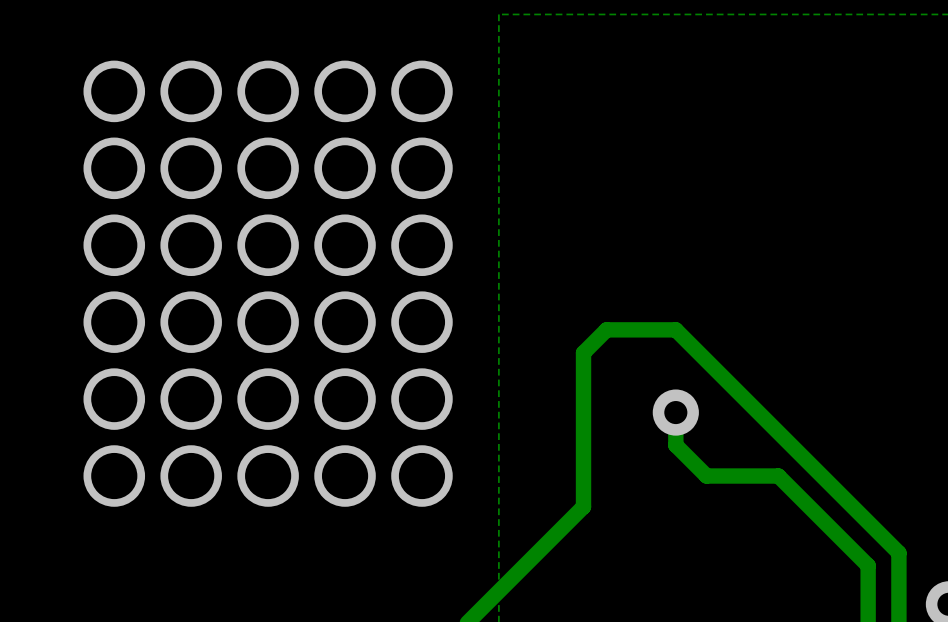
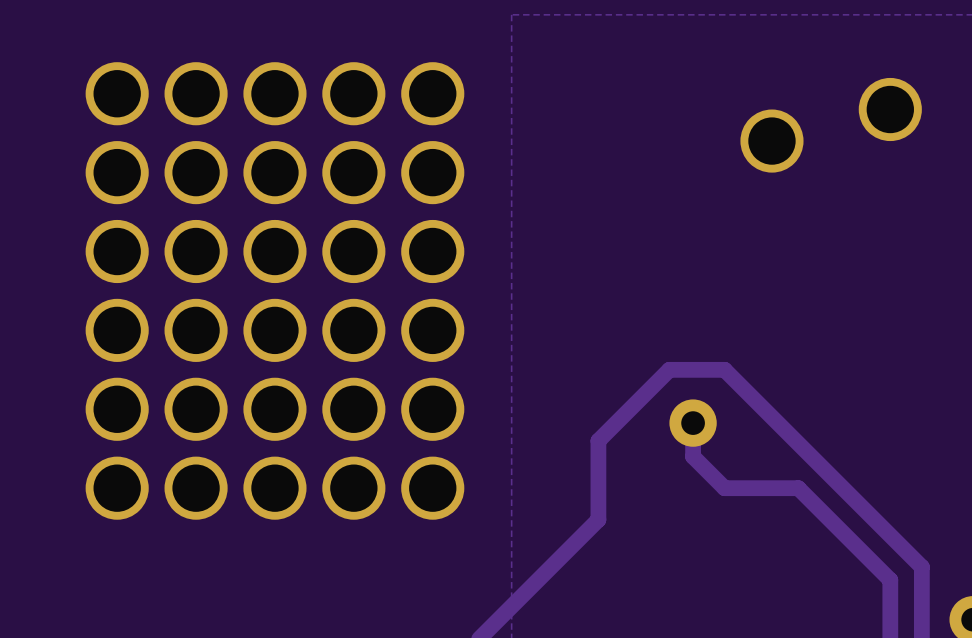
via: none -> (890, 109)
via: none -> (771, 141)
track: (706, 360) (675, 329) (606, 329) (583, 352) (583, 429) -> (724, 369) (669, 369) (598, 440)

